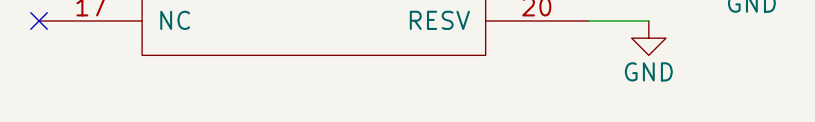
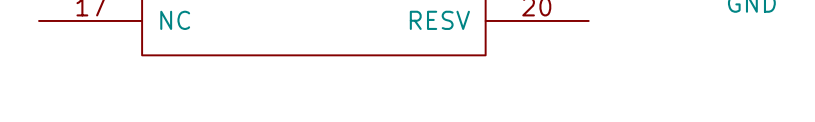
no-connect mark: (39, 20) -> none
wire: (588, 20) (648, 20) -> none
power symbol: GND (648, 38) -> none

